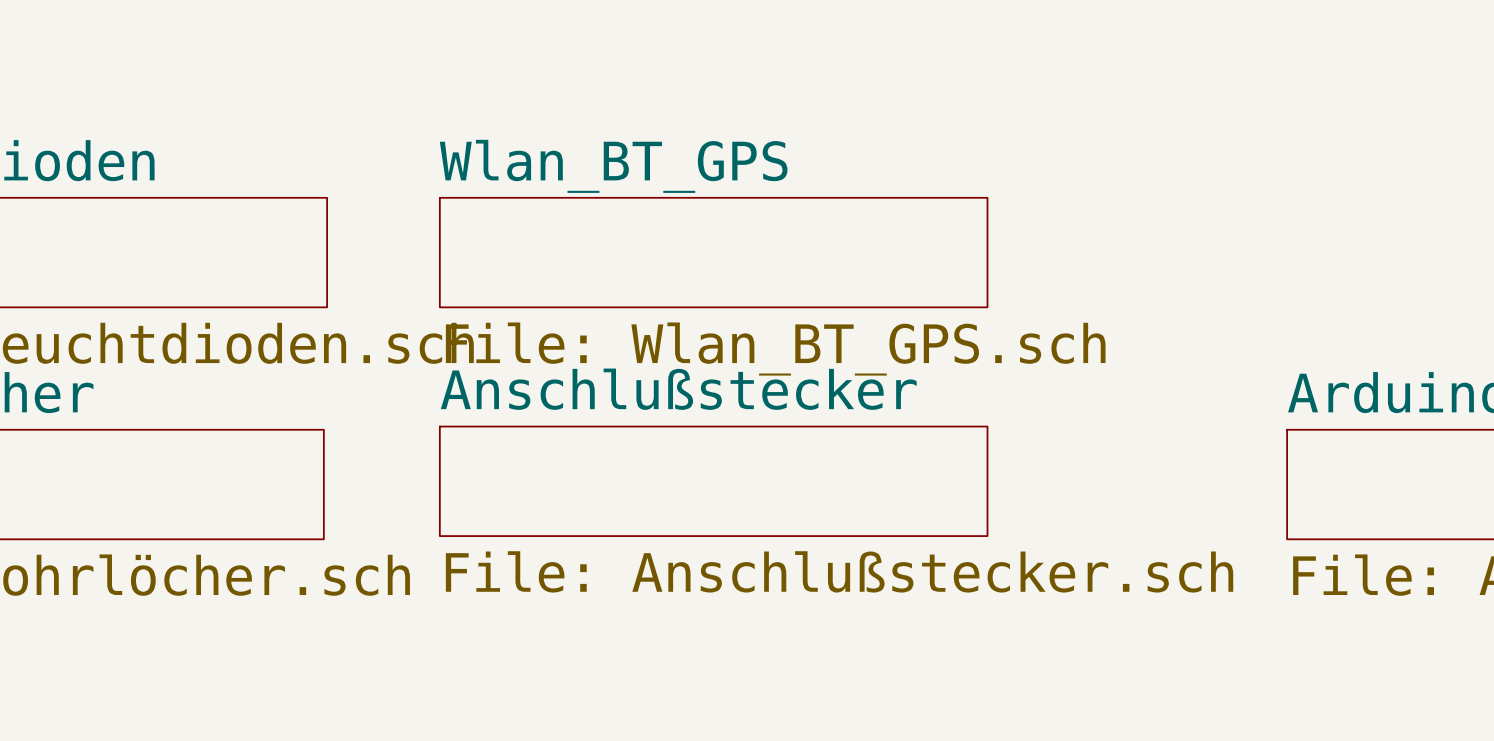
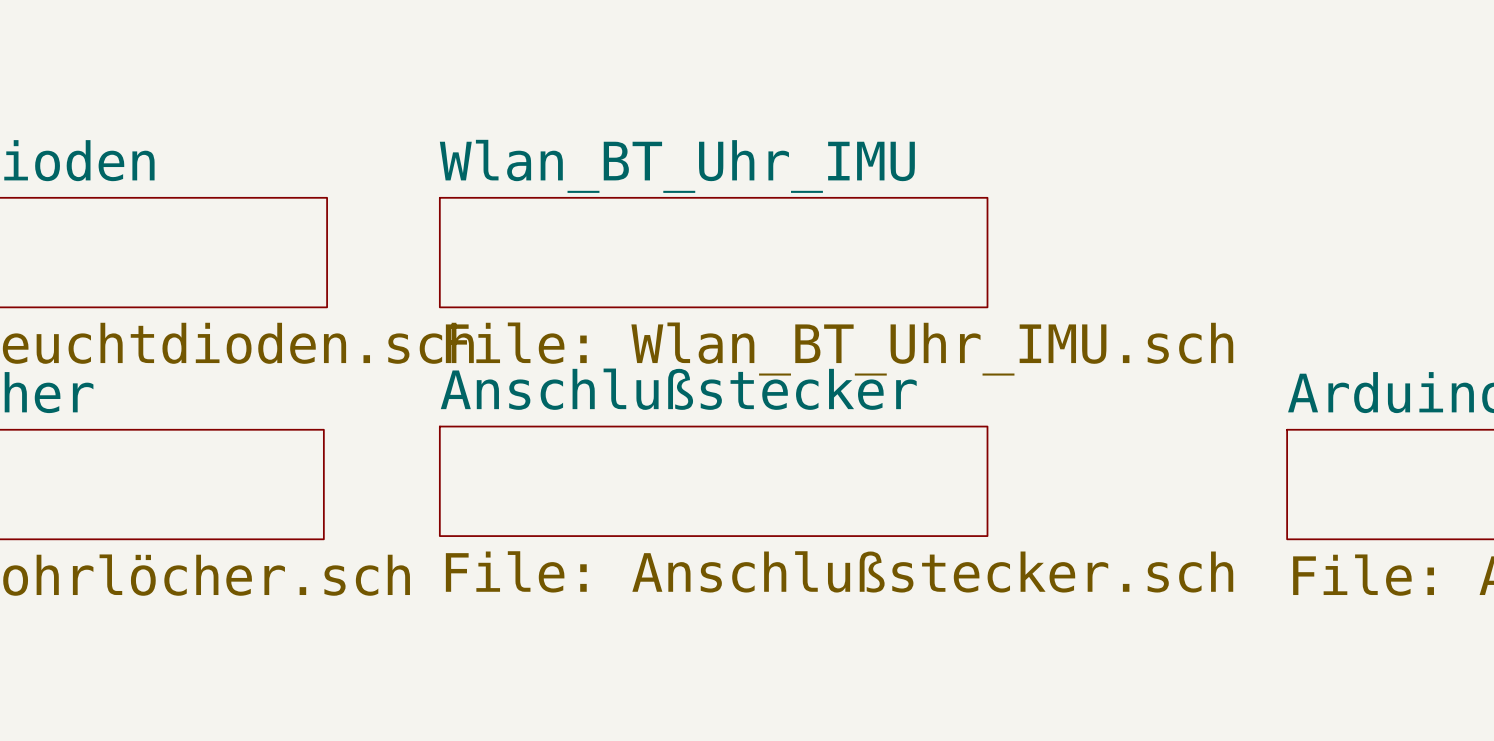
sheet Wlan_BT_GPS name: Wlan_BT_GPS (613, 166) -> Wlan_BT_Uhr_IMU (677, 166)
sheet Wlan_BT_GPS value: File: Wlan_BT_GPS.sch (775, 349) -> File: Wlan_BT_Uhr_IMU.sch (839, 349)

